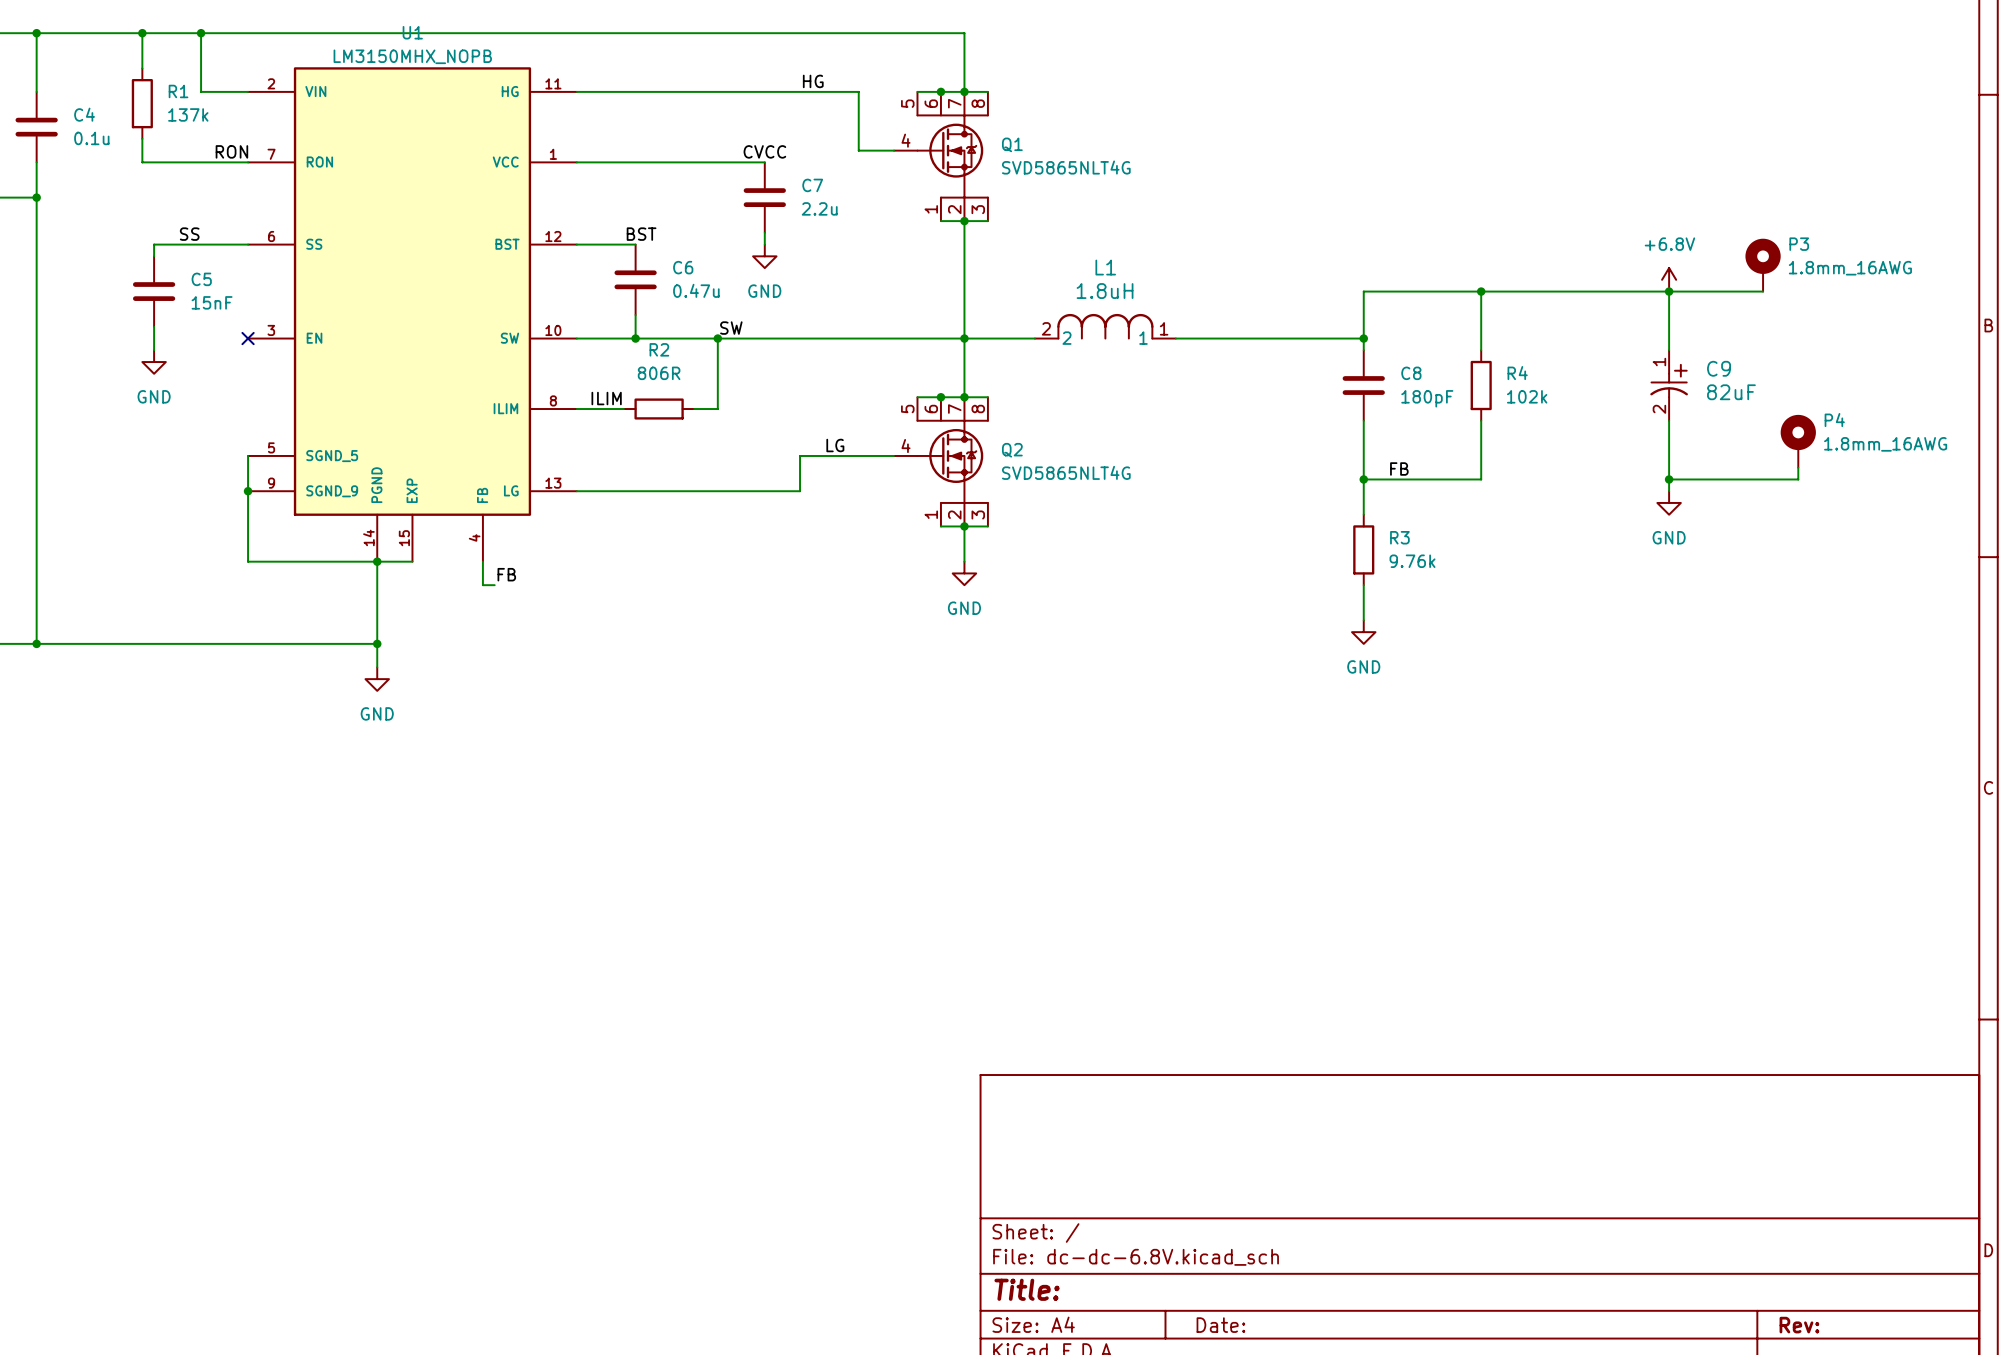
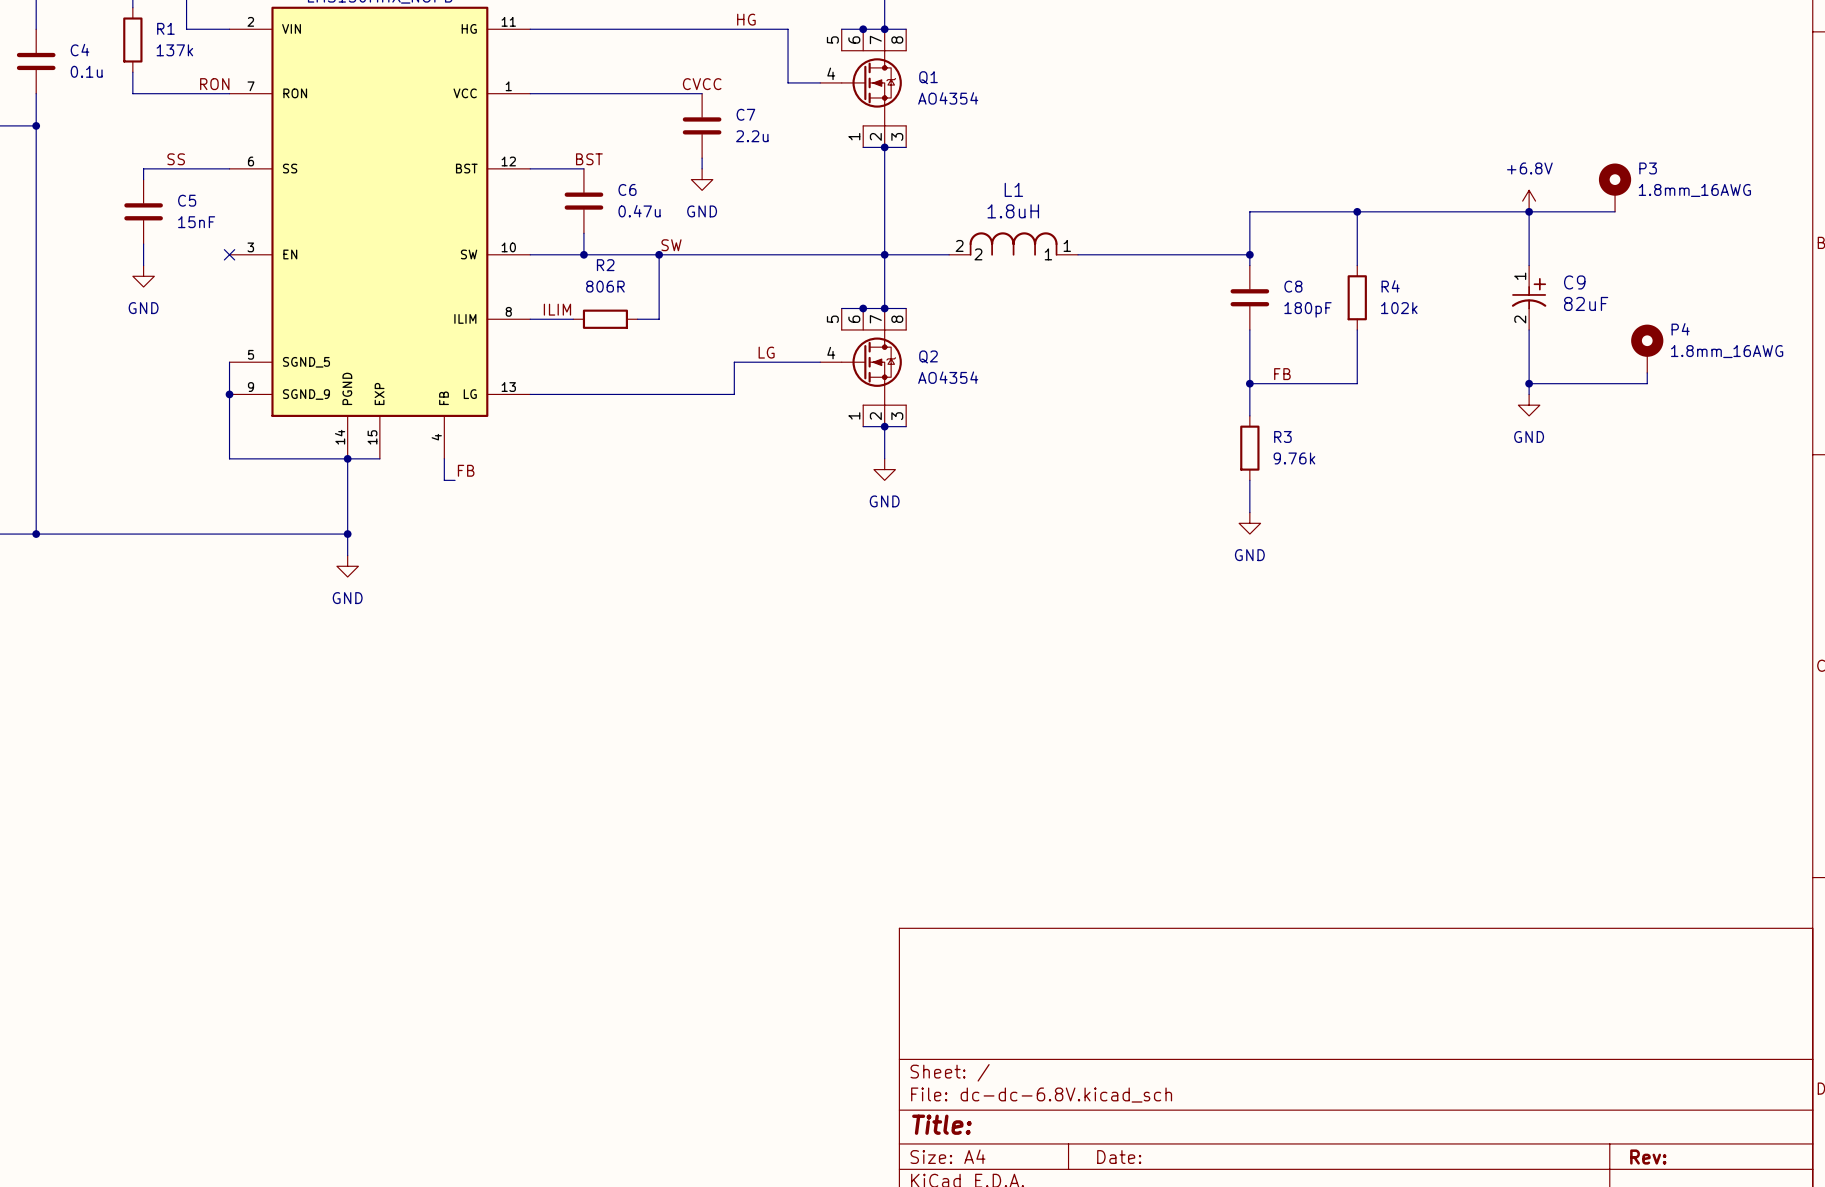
Q1 value: SVD5865NLT4G (1066, 167) -> AO4354 (948, 98)
Q2 value: SVD5865NLT4G (1066, 472) -> AO4354 (948, 377)

